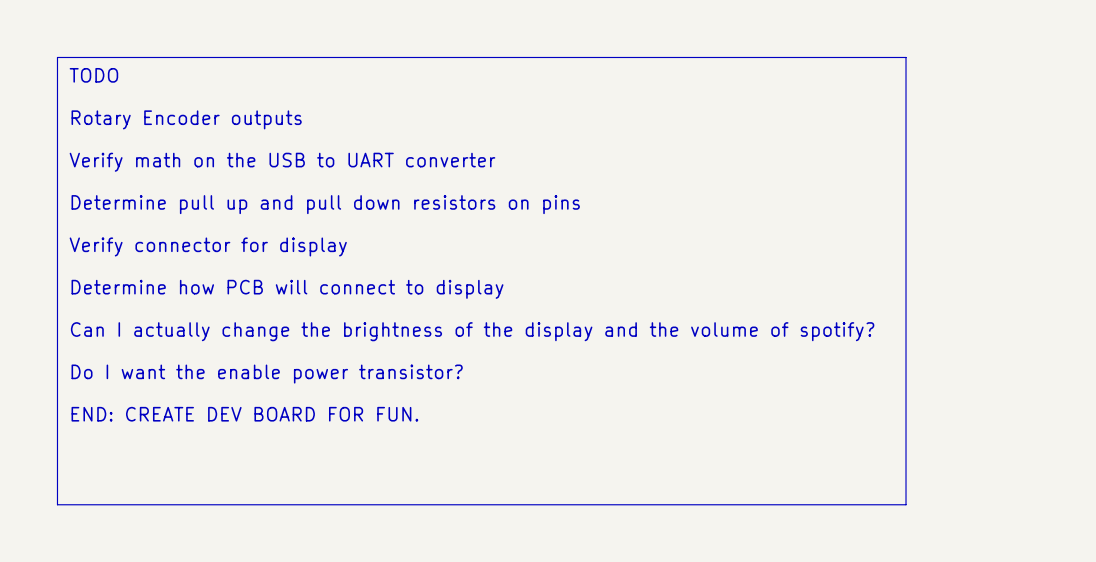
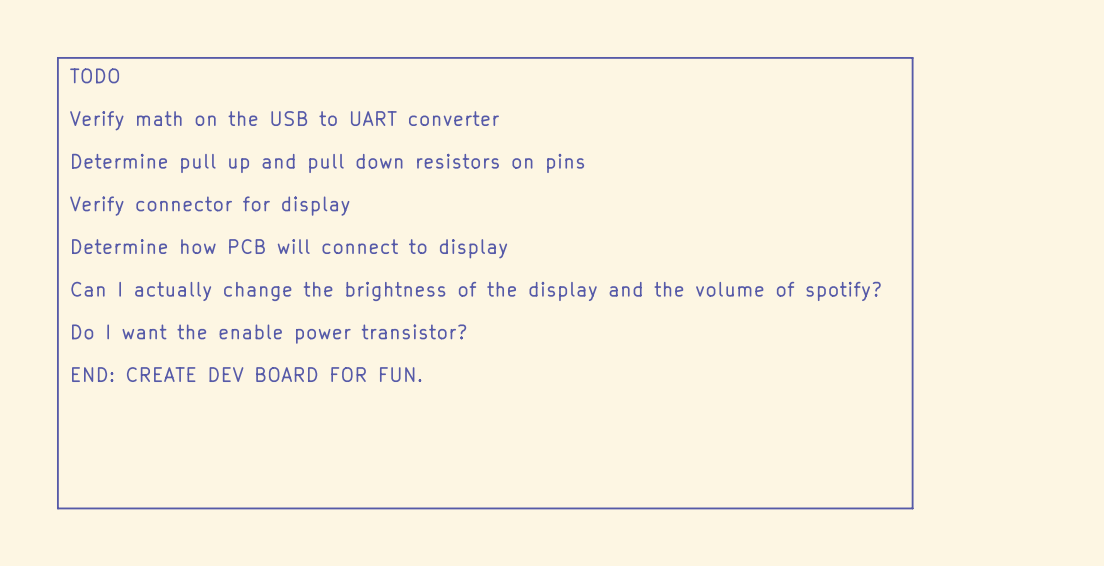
text: Rotary Encoder outputs (186, 119) -> Verify math on the USB to UART converter (284, 120)
text: Verify math on the USB to UART converter (282, 162) -> Determine pull up and pull down resistors on pins (328, 163)
text: Determine pull up and pull down resistors on pins (325, 204) -> Verify connector for display (209, 206)
text: Verify connector for display (208, 246) -> Determine how PCB will connect to display (289, 248)
text: Determine how PCB will connect to display (287, 289) -> Can I actually change the brightness of the display and the volume of spotify? (476, 291)
text: Can I actually change the brightness of the display and the volume of spotify? (472, 331) -> Do I want the enable power transistor? (269, 334)
text: Do I want the enable power transistor? (267, 374) -> END: CREATE DEV BOARD FOR FUN. (246, 374)
text: END: CREATE DEV BOARD FOR FUN. (244, 414) -> none

